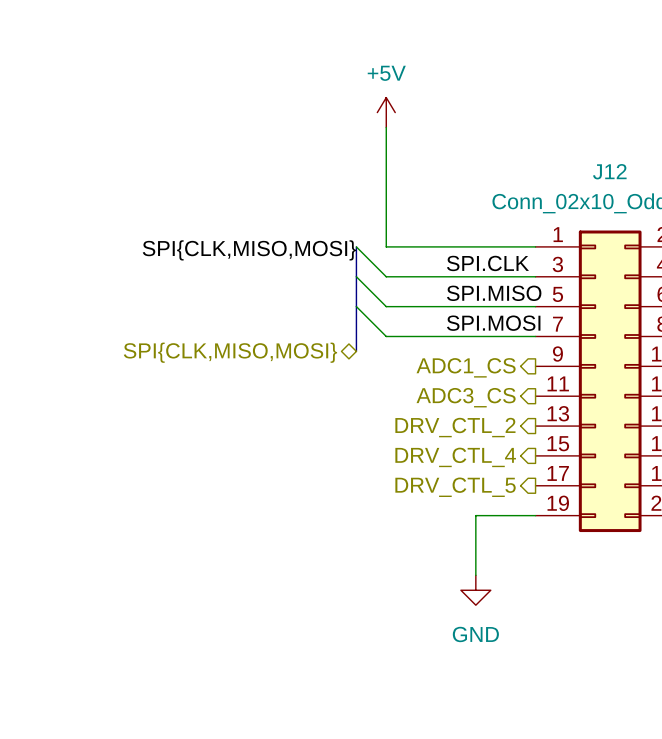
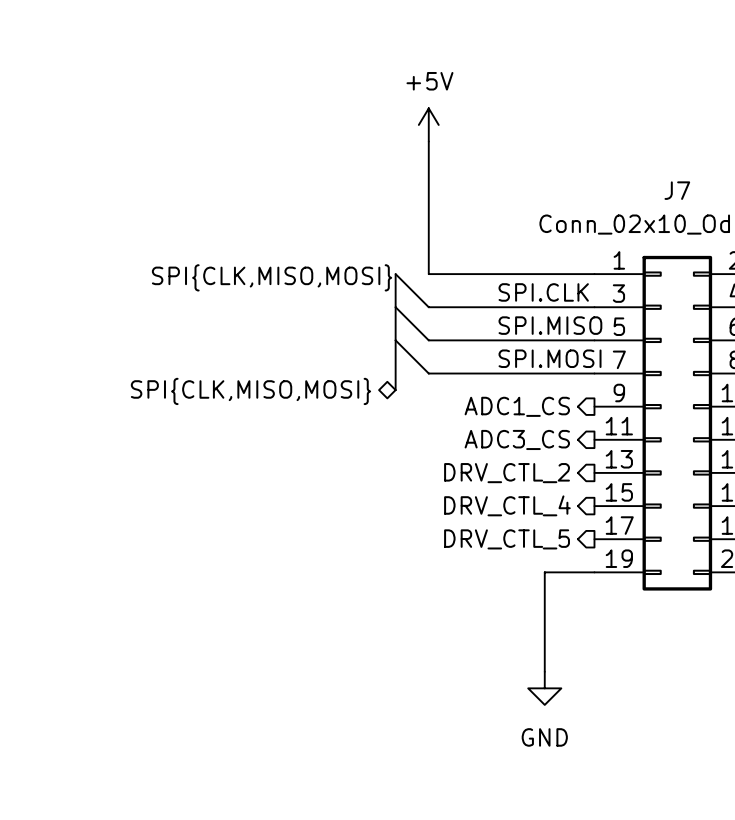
J12 name: J12 (609, 171) -> J7 (677, 190)
wire: (490, 515) (475, 515) (475, 575) -> (544, 572) (544, 671)
power symbol position: GND (475, 590) -> GND (544, 688)

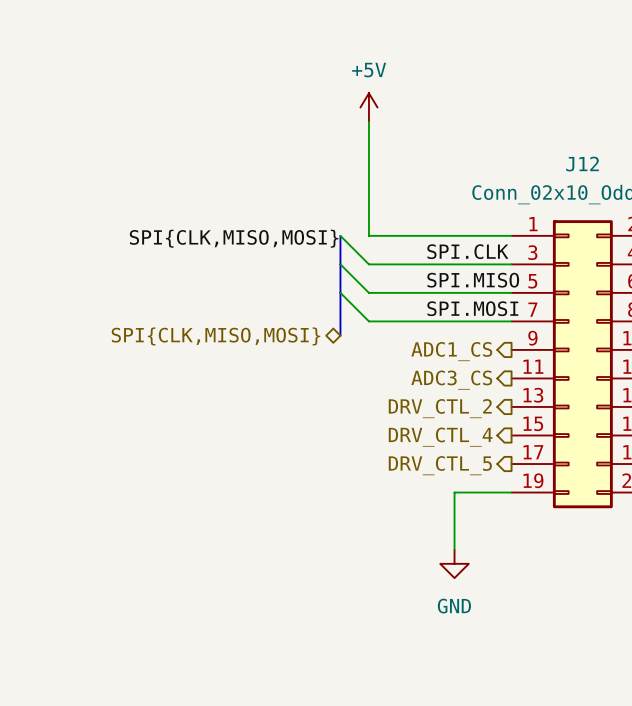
J7 name: J7 (677, 190) -> J12 (582, 164)
wire: (544, 572) (544, 671) -> (468, 492) (454, 492) (454, 549)
power symbol position: GND (544, 688) -> GND (454, 563)

